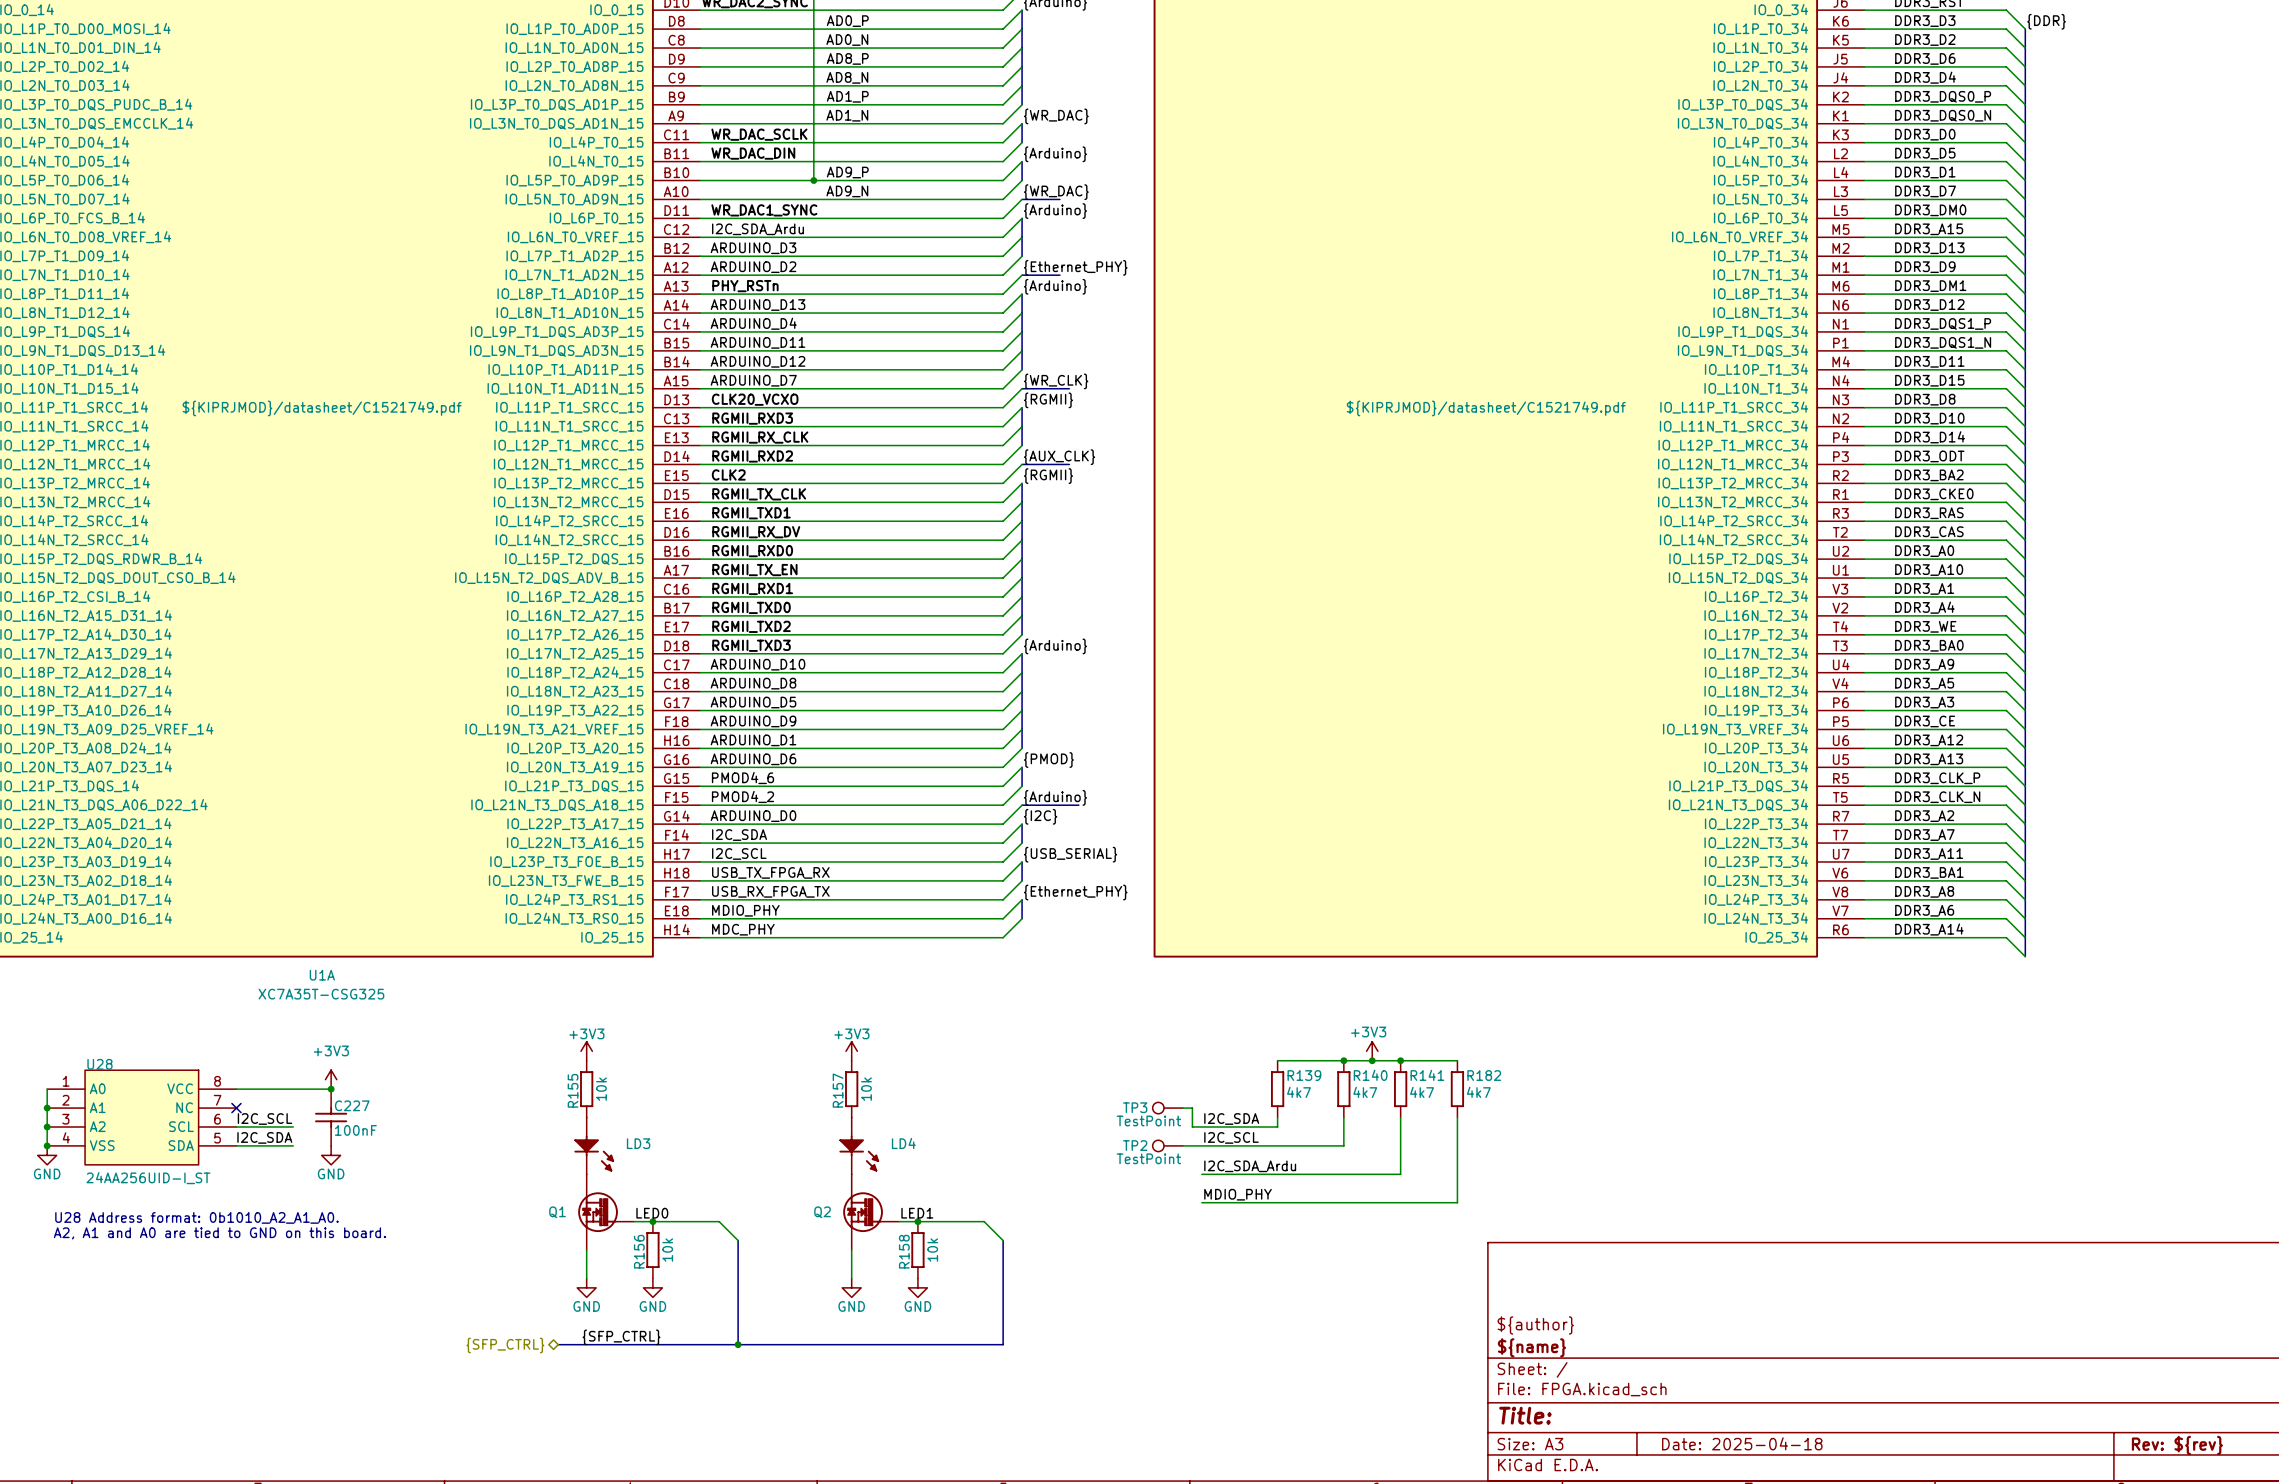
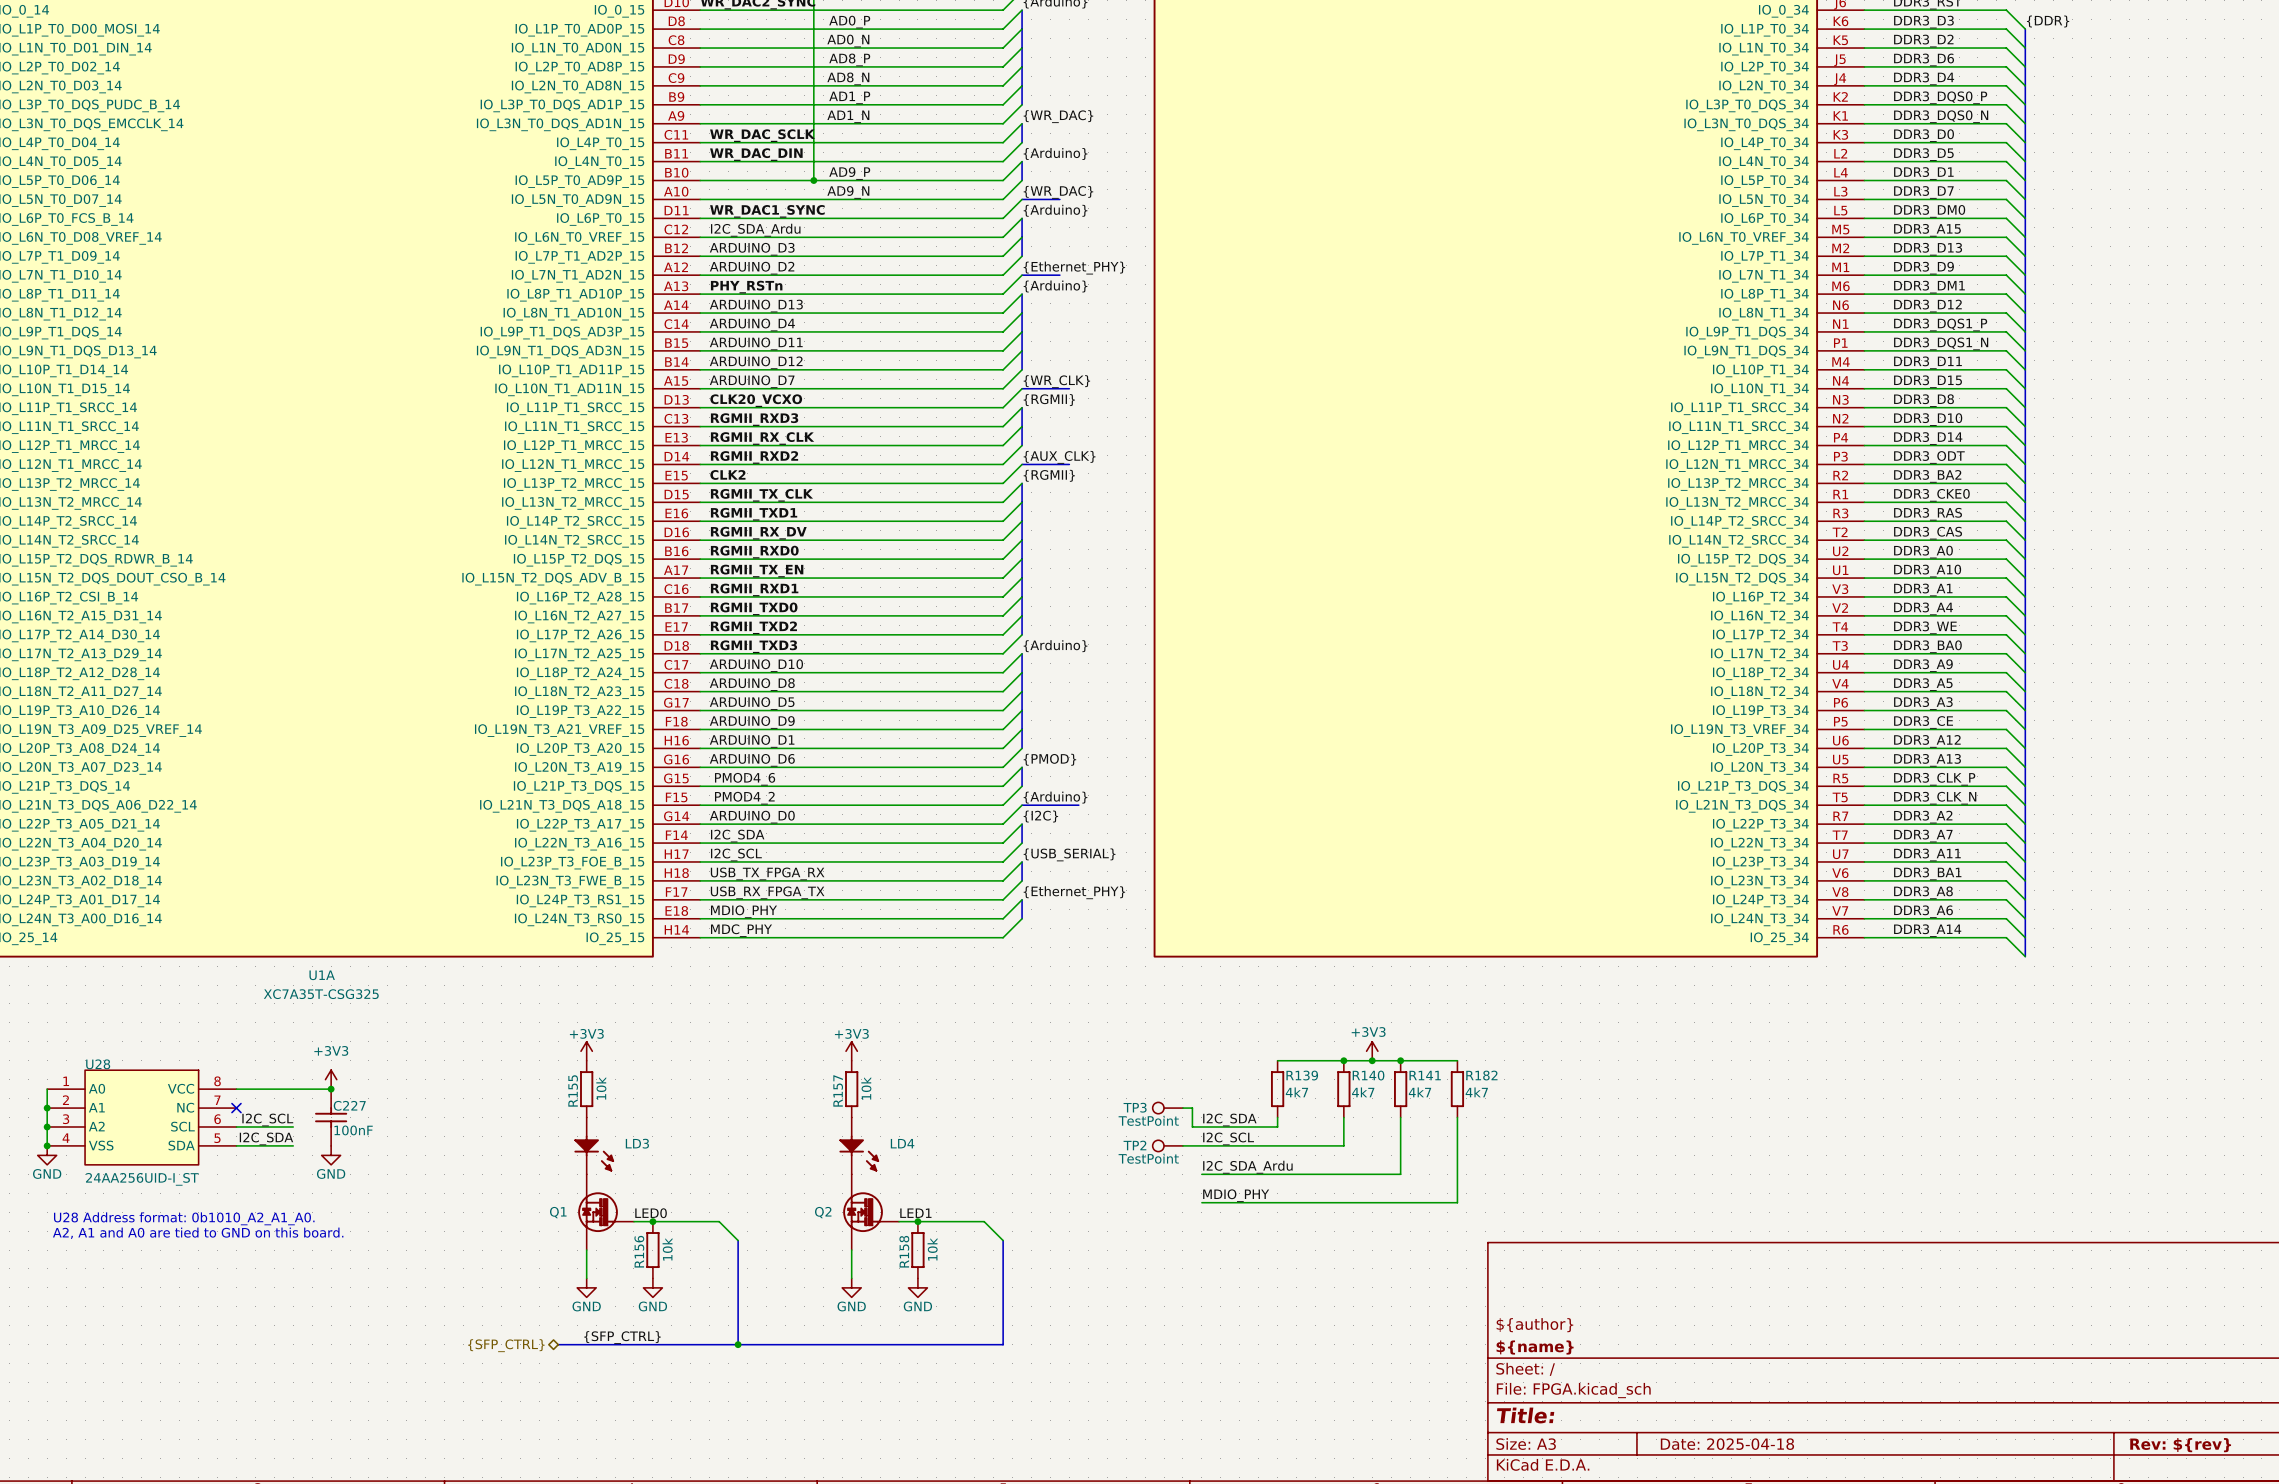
U1A text: ${KIPRJMOD}/datasheet/C1521749.pdf (322, 408) -> none
part text: ${KIPRJMOD}/datasheet/C1521749.pdf (1486, 408) -> none

